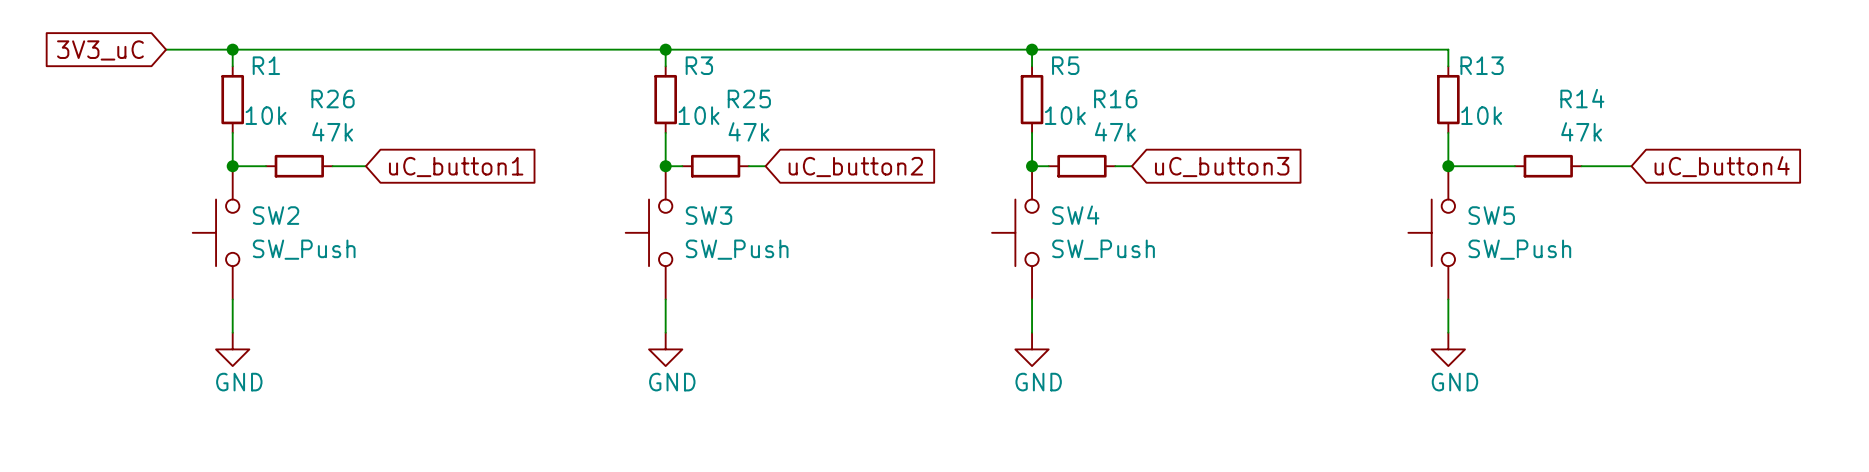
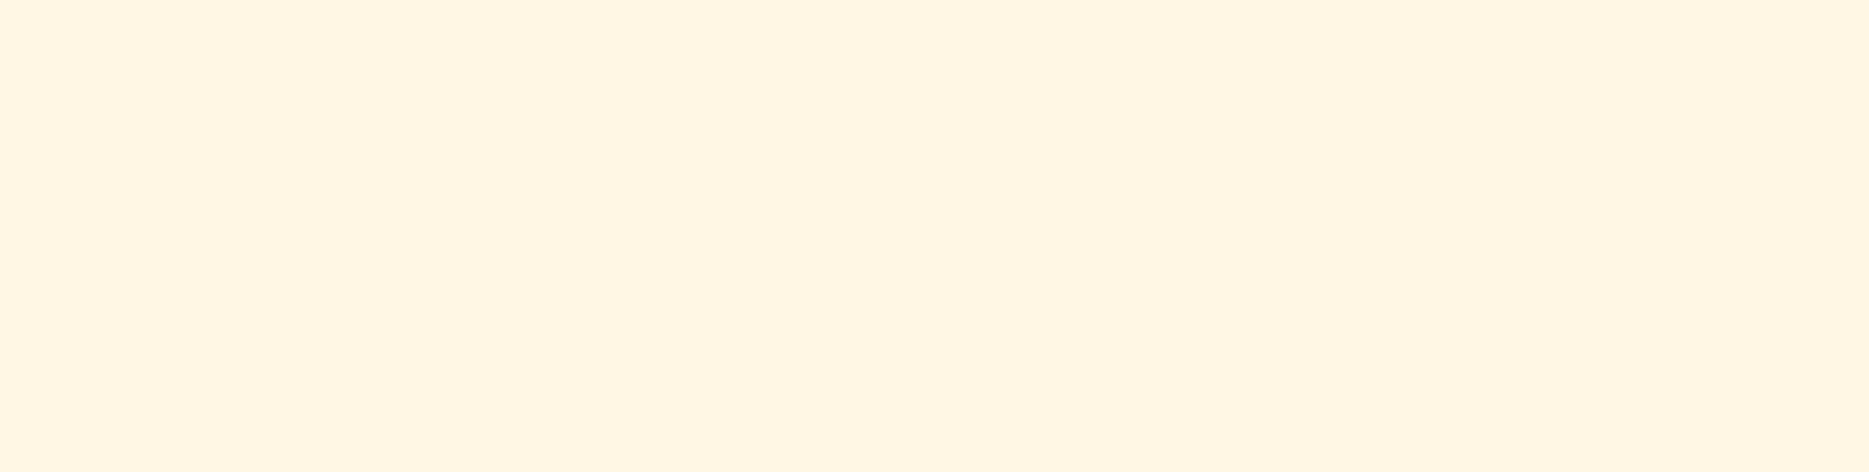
wire: (166, 49) (1448, 49) (1448, 66) -> none
wire: (232, 49) (232, 66) -> none
junction: (232, 49) -> none
wire: (665, 49) (665, 66) -> none
junction: (665, 49) -> none
wire: (1032, 49) (1032, 66) -> none
junction: (1032, 49) -> none
global label: 3V3_uC (100, 50) -> none
R1: 10k (232, 99) -> none
R3: 10k (665, 99) -> none
R5: 10k (1032, 99) -> none
R13: 10k (1448, 99) -> none
wire: (232, 132) (232, 166) (266, 166) -> none
wire: (665, 132) (665, 166) (682, 166) -> none
wire: (1032, 132) (1032, 166) (1048, 166) -> none
wire: (1448, 132) (1448, 166) (1514, 166) -> none
junction: (232, 166) -> none
R26: 47k (299, 166) -> none
wire: (332, 166) (365, 166) -> none
junction: (665, 166) -> none
R25: 47k (715, 166) -> none
wire: (748, 166) (765, 166) -> none
junction: (1032, 166) -> none
R16: 47k (1081, 166) -> none
wire: (1115, 166) (1131, 166) -> none
junction: (1448, 166) -> none
R14: 47k (1548, 166) -> none
wire: (1581, 166) (1631, 166) -> none
global label: uC_button4 (1722, 166) -> none
global label: uC_button1 (456, 167) -> none
global label: uC_button2 (855, 167) -> none
global label: uC_button3 (1222, 167) -> none
SW2: SW_Push (216, 232) -> none
SW3: SW_Push (649, 232) -> none
SW4: SW_Push (1015, 232) -> none
SW5: SW_Push (1431, 232) -> none
wire: (232, 299) (232, 332) -> none
wire: (665, 299) (665, 332) -> none
wire: (1032, 299) (1032, 332) -> none
wire: (1448, 299) (1448, 332) -> none
power symbol: GND (232, 349) -> none
power symbol: GND (665, 349) -> none
power symbol: GND (1032, 349) -> none
power symbol: GND (1448, 349) -> none

